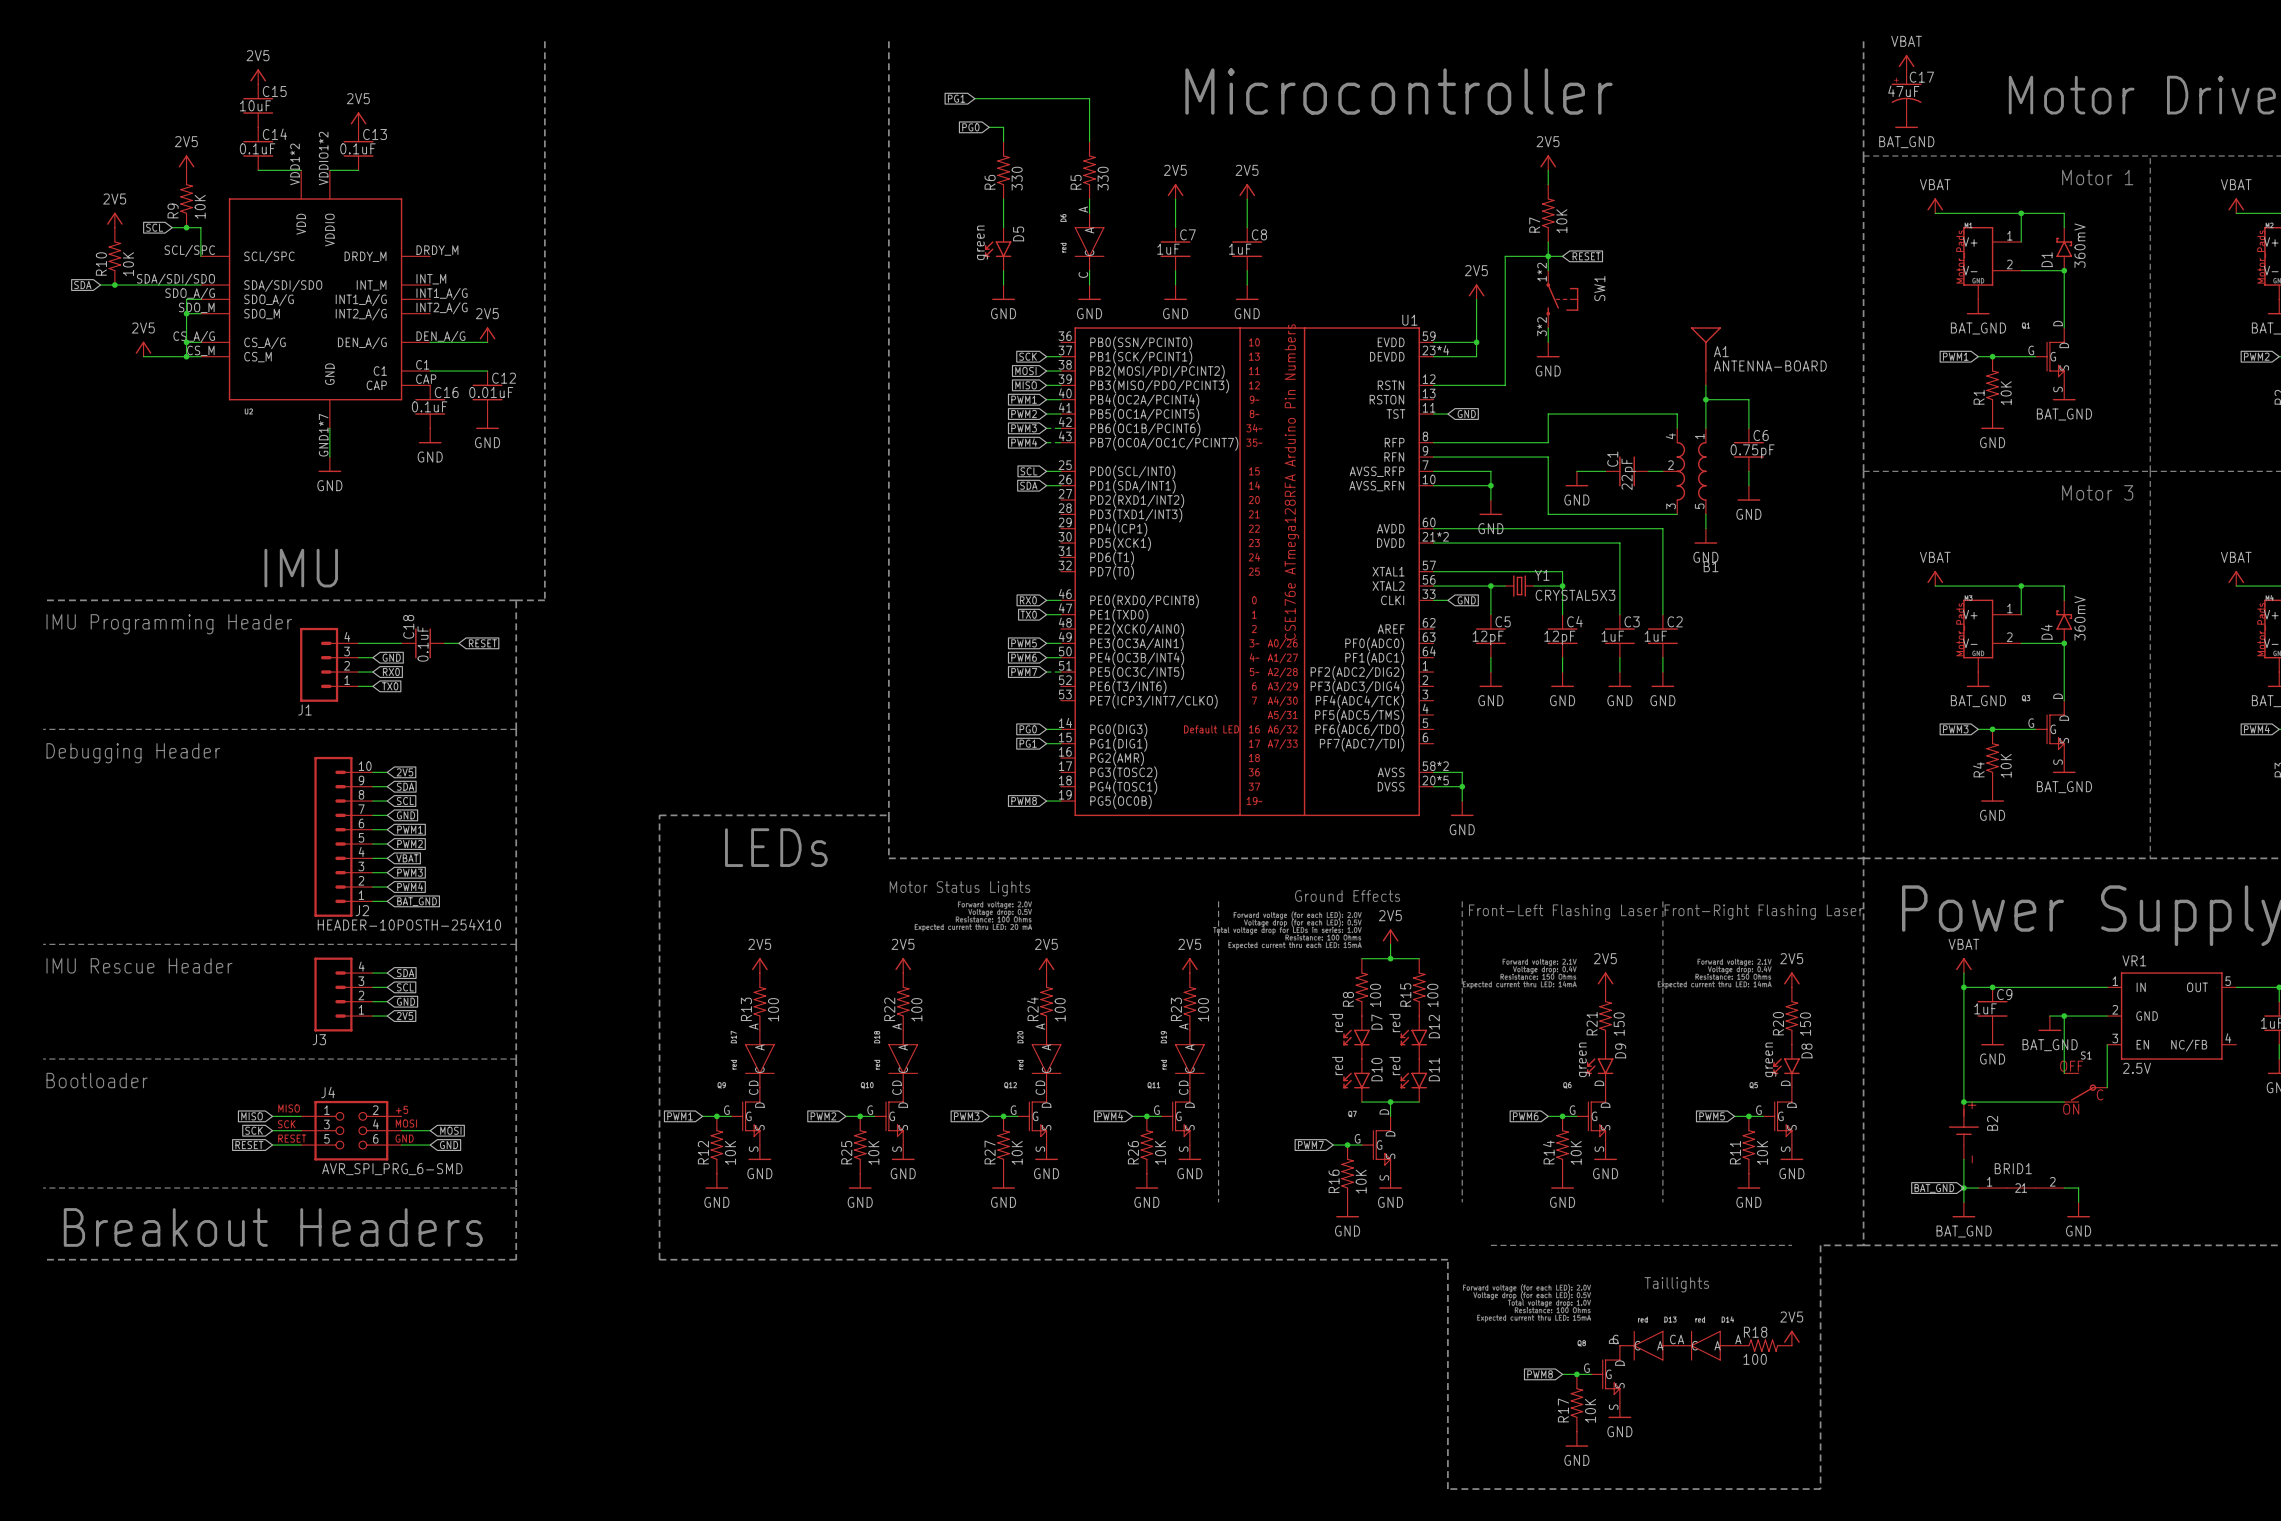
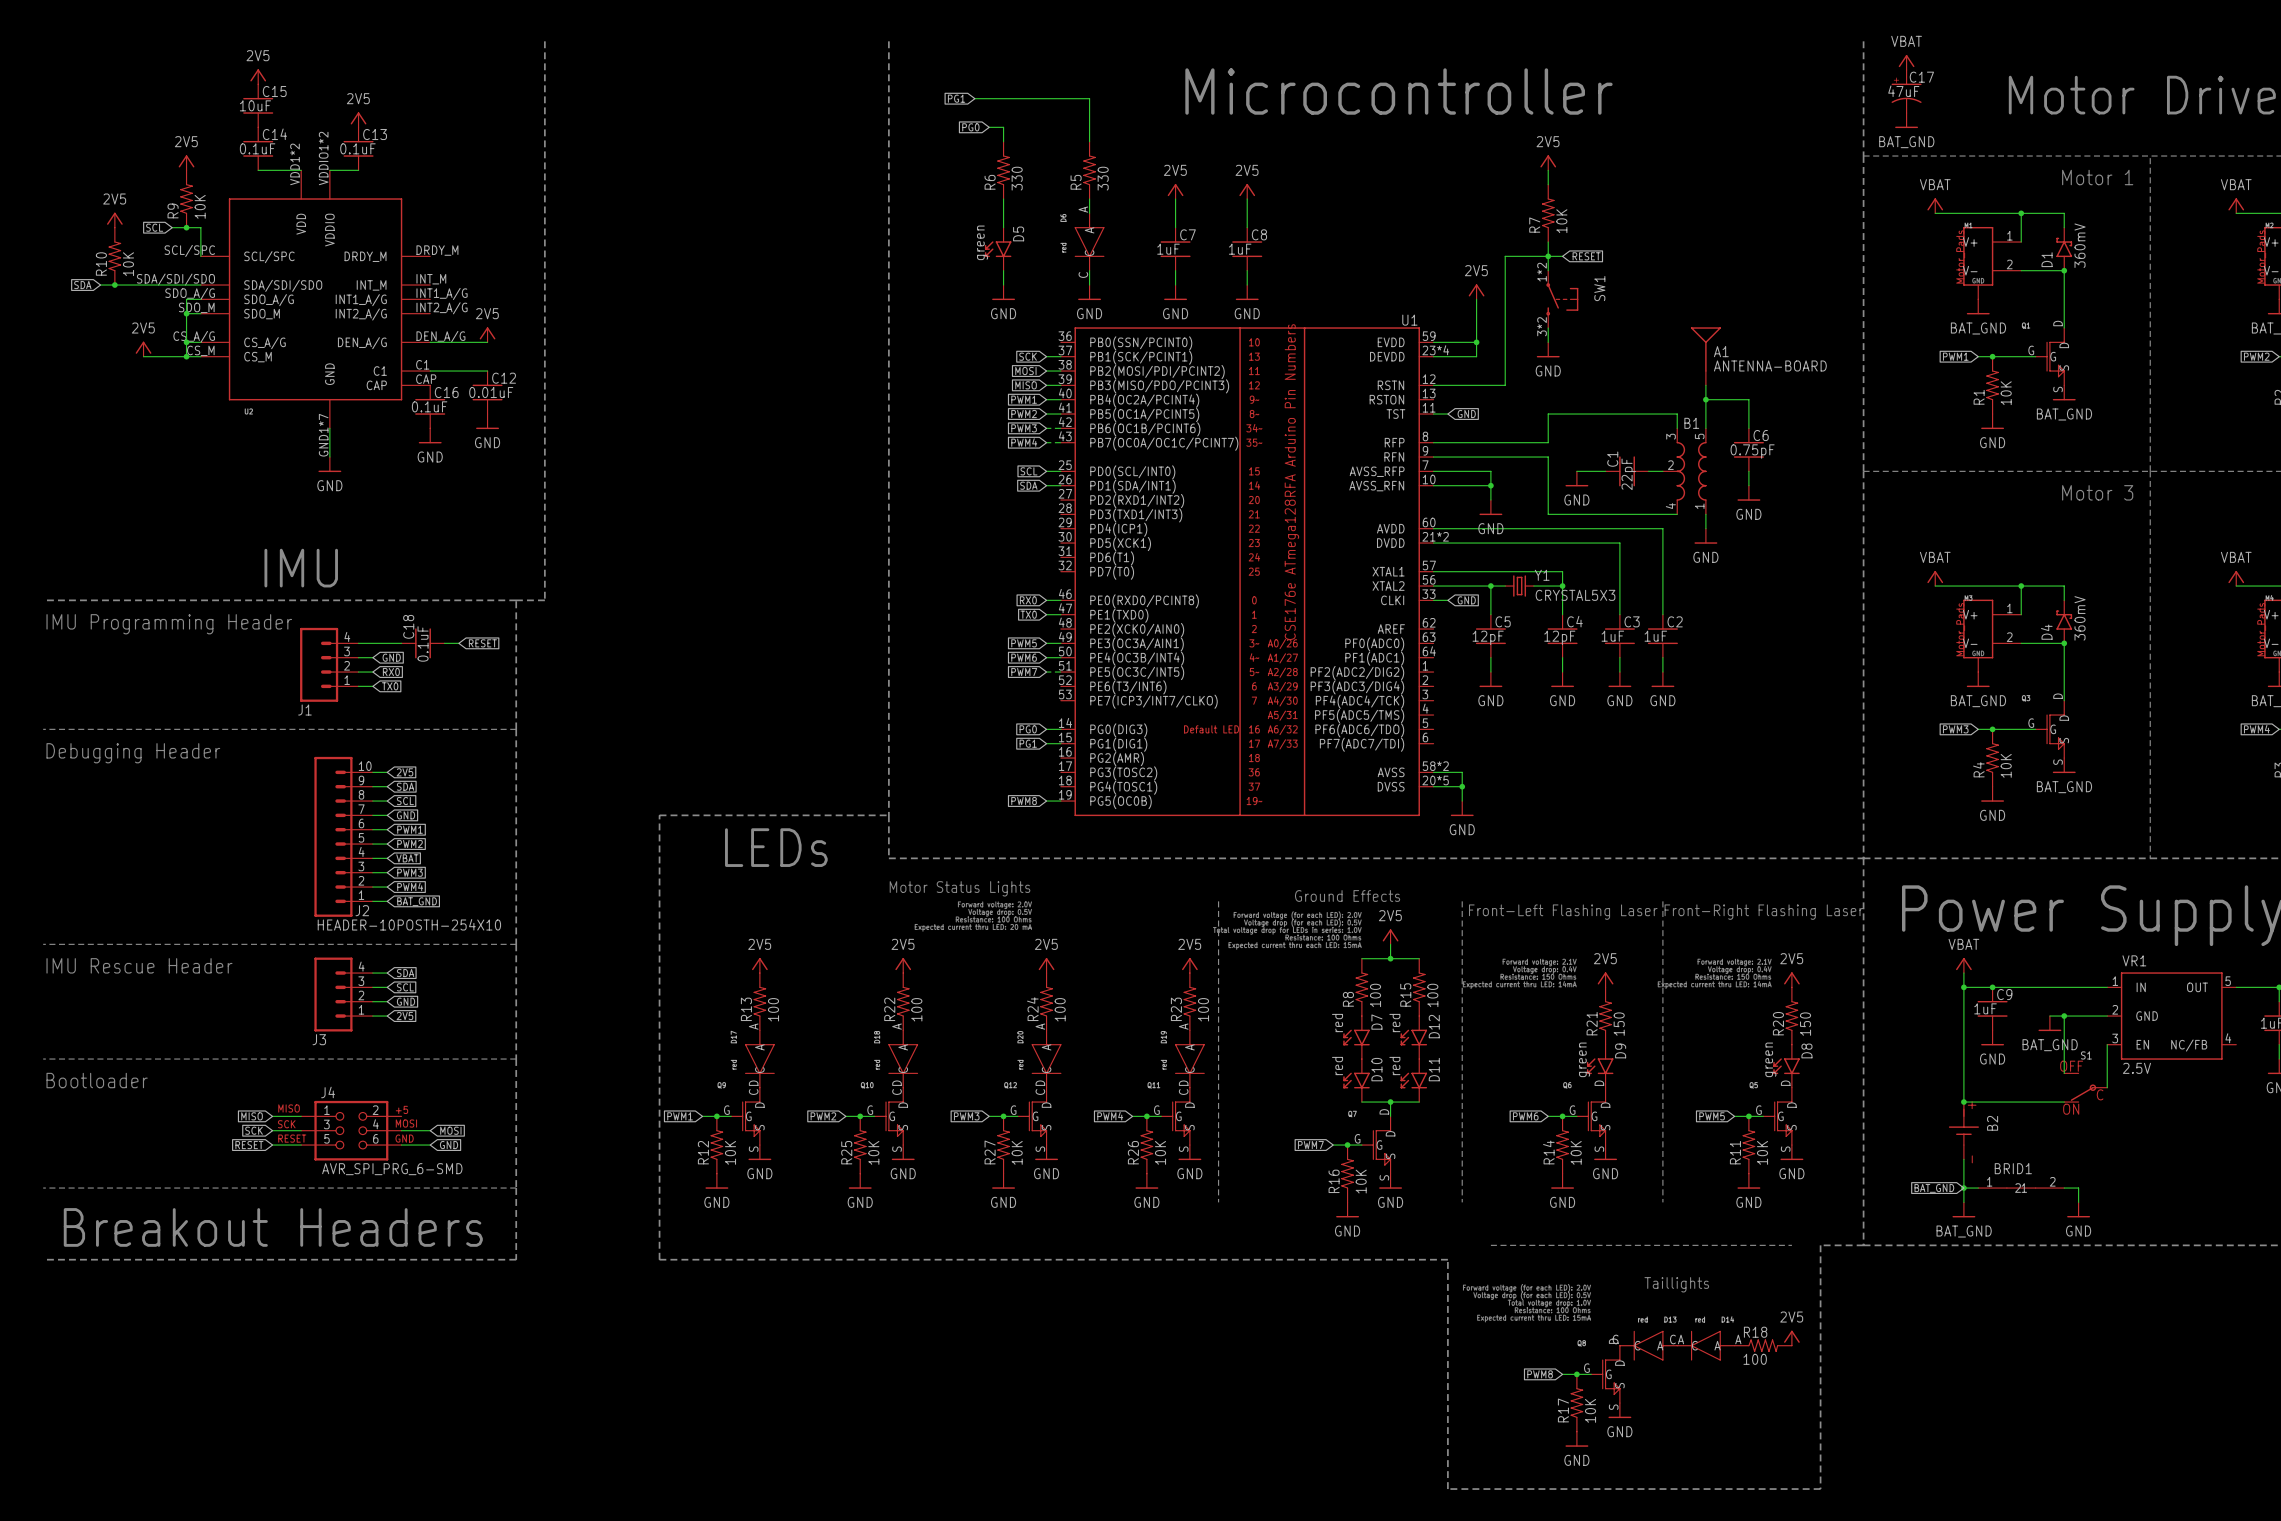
B1 flip: as is (1691, 471) -> up-down (1691, 471)
B1 name position: B1 (1711, 566) -> B1 (1691, 423)

